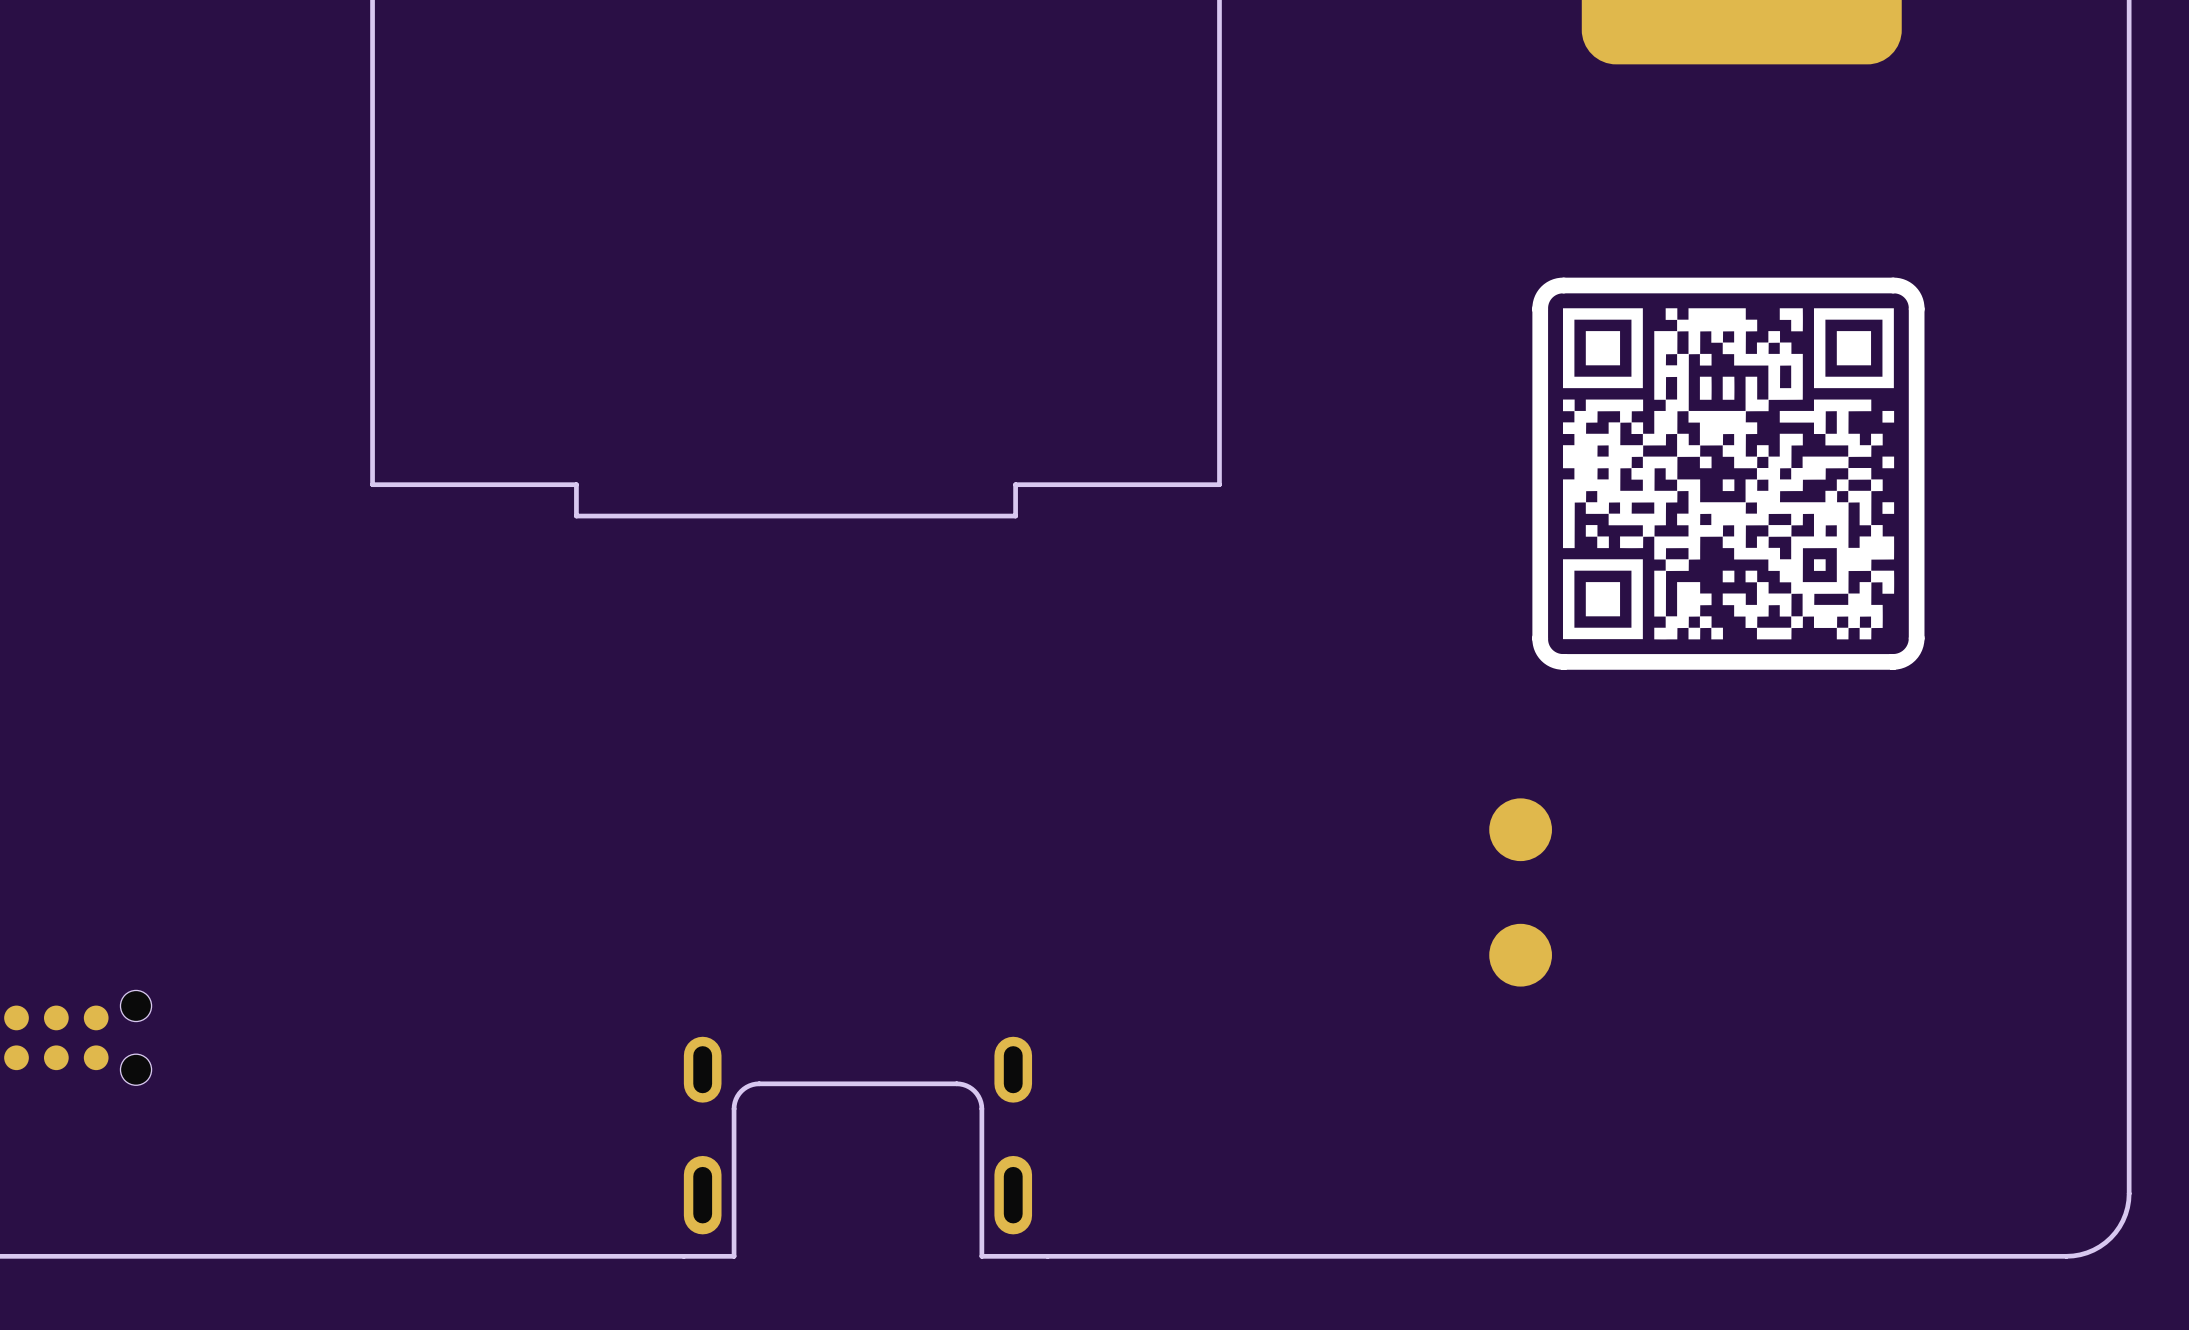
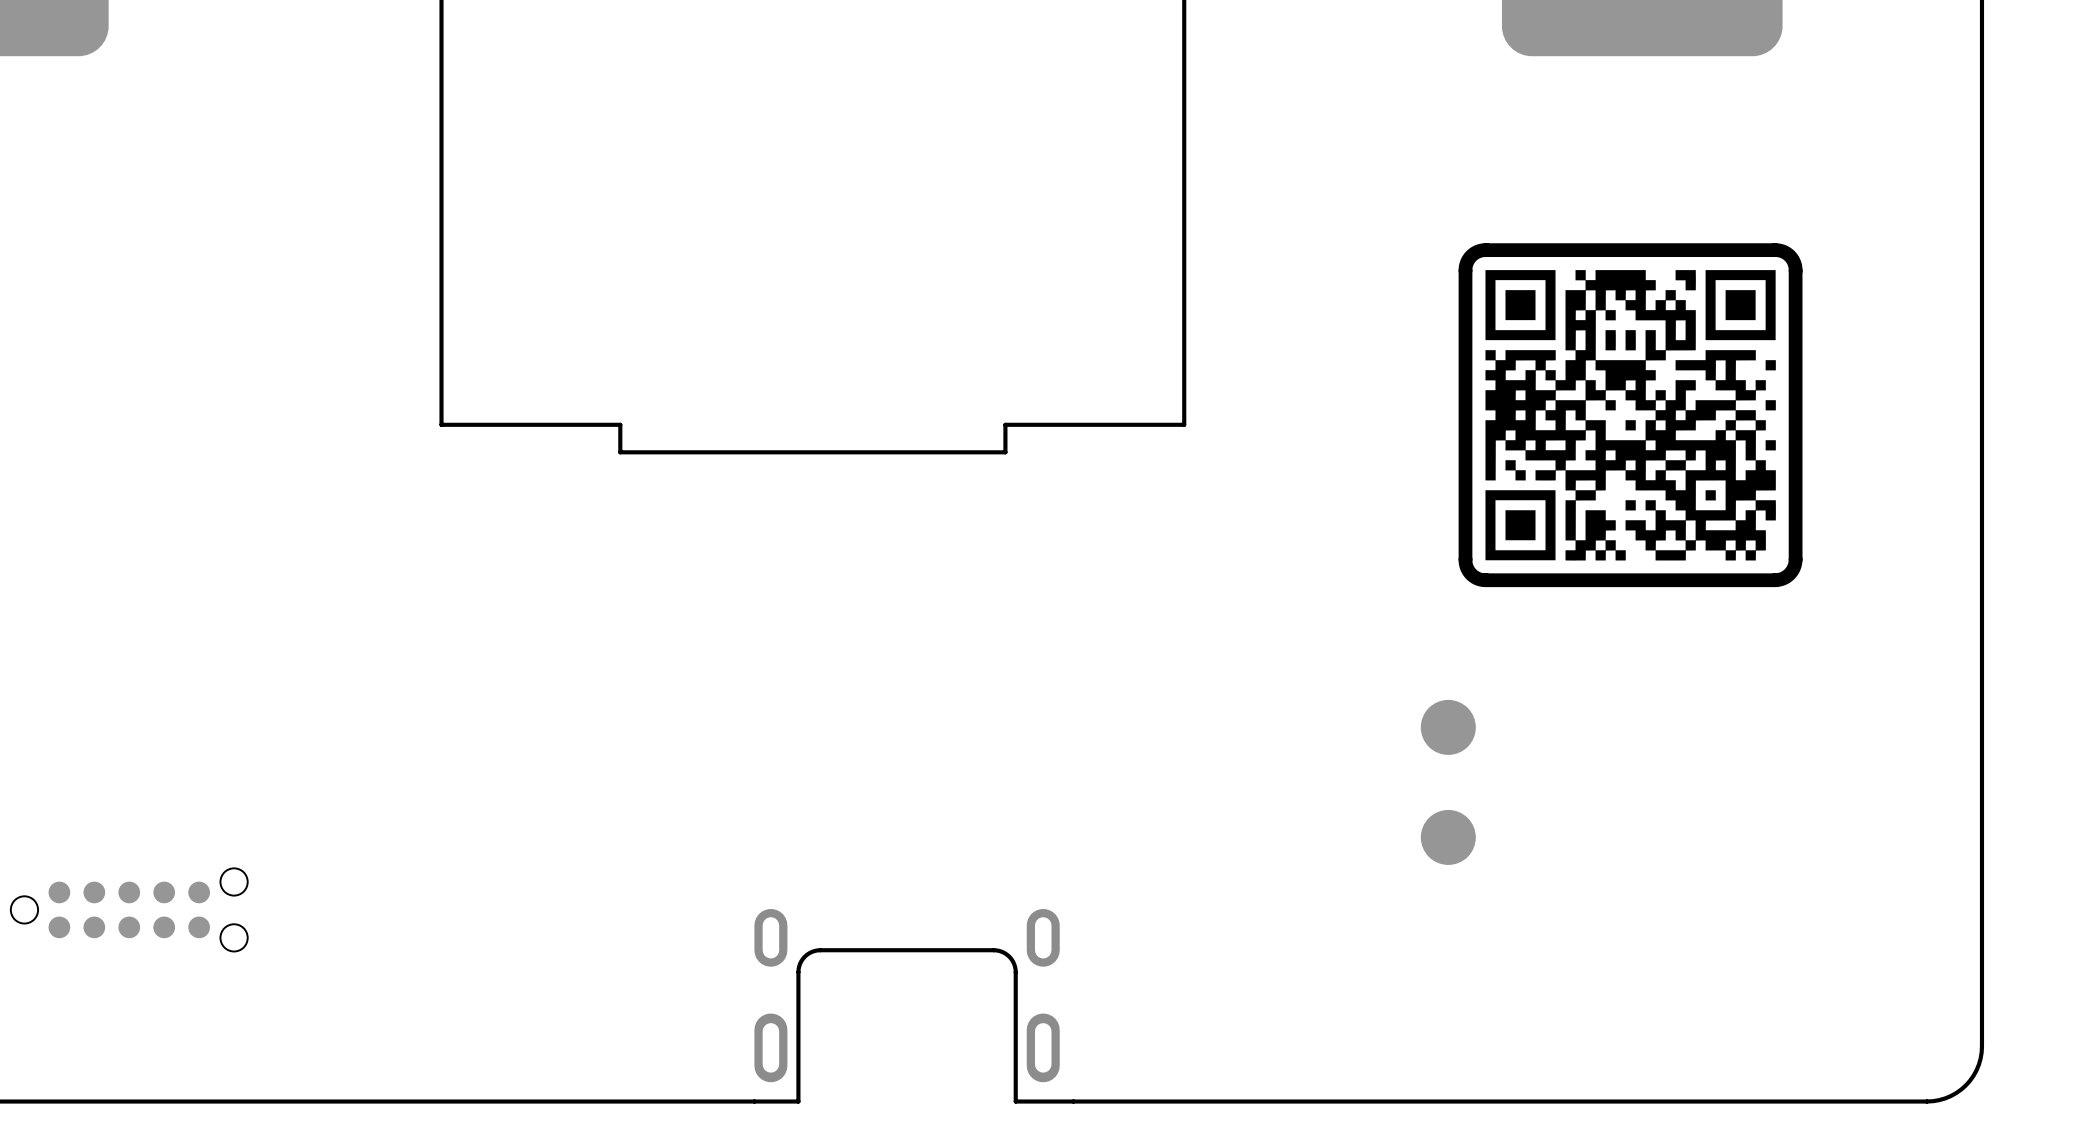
part position: (865, 1147) -> (913, 1006)
board edge: (1093, 1256) (1047, 1256) -> (754, 1101) (714, 1101)

